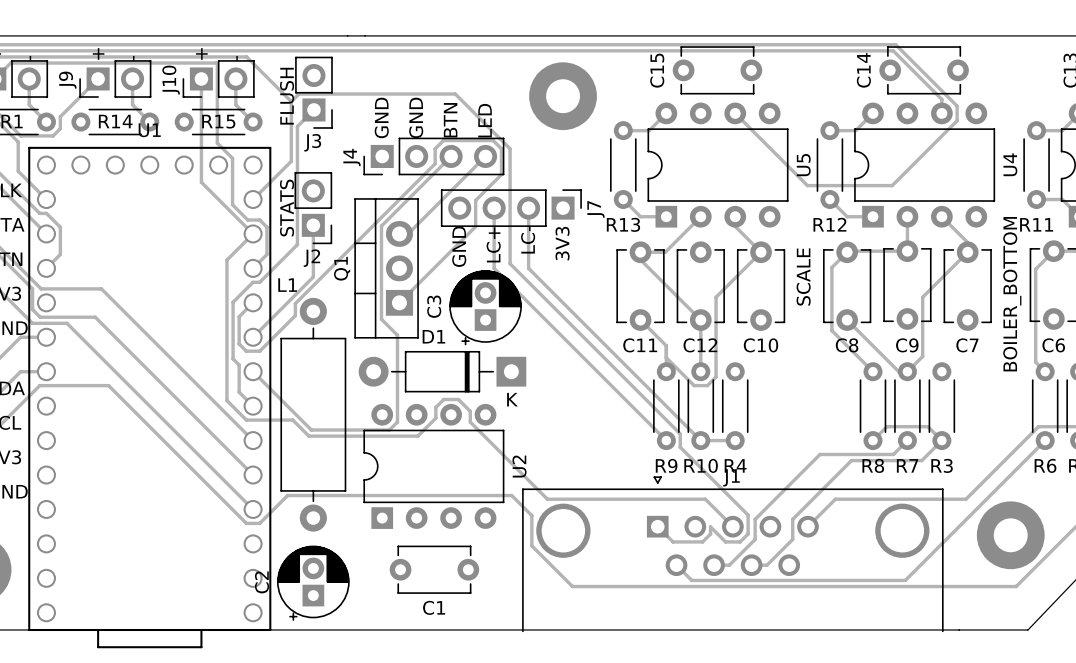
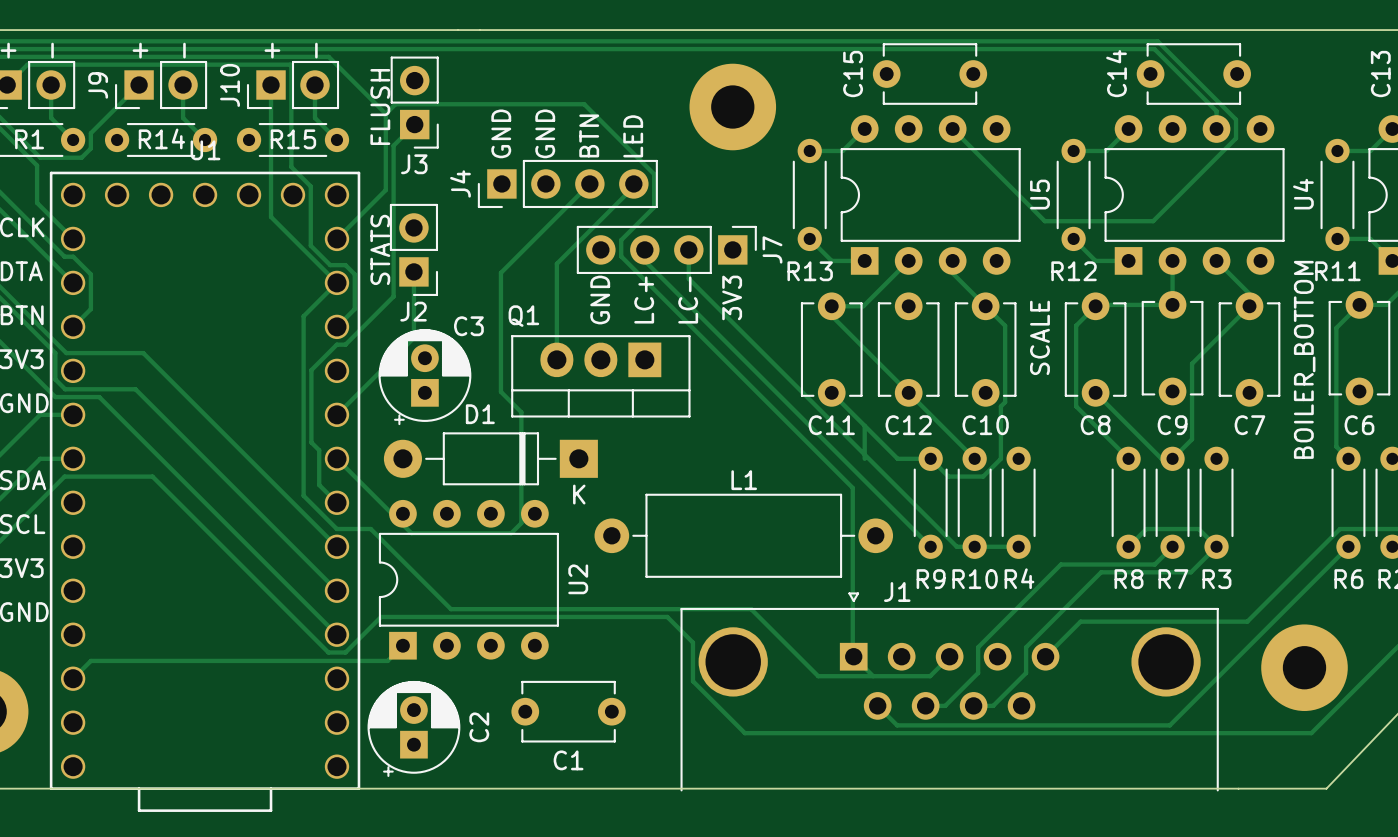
track: (446, 94) (455, 94) (510, 148) (510, 263) (680, 433) (680, 447) (748, 515) (748, 534) (740, 541) (725, 541) (710, 526) (710, 534) (702, 541) -> (949, 656) (930, 676) (911, 676)
track: (493, 140) (443, 140) (435, 148) (435, 163) (295, 303) (295, 315) (259, 351) (246, 351) (239, 343) (239, 316) (253, 302) -> (643, 163) (584, 104)
track: (485, 156) (408, 233) (399, 233) -> (633, 183) (633, 186) (556, 263) (556, 359)
track: (475, 213) (475, 226) (399, 302) -> (621, 256) (852, 487) (853, 656)
track: (494, 216) (494, 268) (666, 440) -> (644, 260) (930, 546)
track: (528, 230) (528, 268) (700, 440) (735, 440) -> (688, 278) (956, 546) (1018, 546)
track: (761, 252) (716, 297) (716, 377) (707, 385) (694, 385) (666, 357) -> (985, 306) (1005, 325) (1005, 402) (1000, 406) (1000, 458) (983, 476) (948, 476) (930, 458) (897, 458) (864, 425)
Q1 name position: Q1 (342, 268) -> Q1 (523, 316)
Q1 rotation: 0° (386, 268) -> 90° counterclockwise (600, 376)
L1 name position: L1 (287, 285) -> L1 (744, 480)
C3 name rotation: 0° (434, 306) -> 90° clockwise (468, 326)
C3 name position: C3 (434, 306) -> C3 (468, 326)
C3 position: (485, 307) -> (424, 377)
track: (700, 320) (700, 371) -> (908, 392) (974, 458)
D1 position: (442, 371) -> (490, 458)
R9 position: (666, 406) -> (930, 502)
R10 position: (700, 406) -> (974, 502)
R4 position: (735, 406) -> (1018, 502)
L1 rotation: 0° (313, 414) -> 90° clockwise (743, 535)
L1 position: (313, 414) -> (743, 535)
track: (246, 420) (292, 420) (308, 436) (417, 436) (435, 418) (435, 407) (443, 399) (458, 399) (470, 411) (470, 422) (547, 499) (705, 499) (732, 526) -> (328, 520) (336, 529) (370, 529) (450, 609) (751, 609) (818, 676) (873, 676)
U2 position: (433, 466) -> (468, 579)
J1 name position: J1 (731, 477) -> J1 (897, 592)
track: none -> (402, 645) (387, 660) (90, 660) (73, 678)
C2 name position: C2 (262, 582) -> C2 (479, 727)

